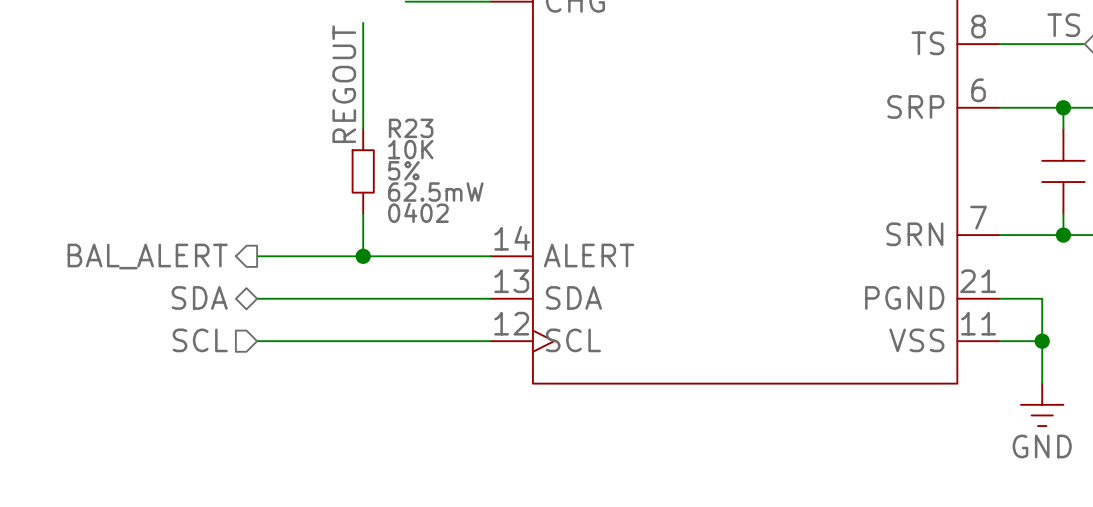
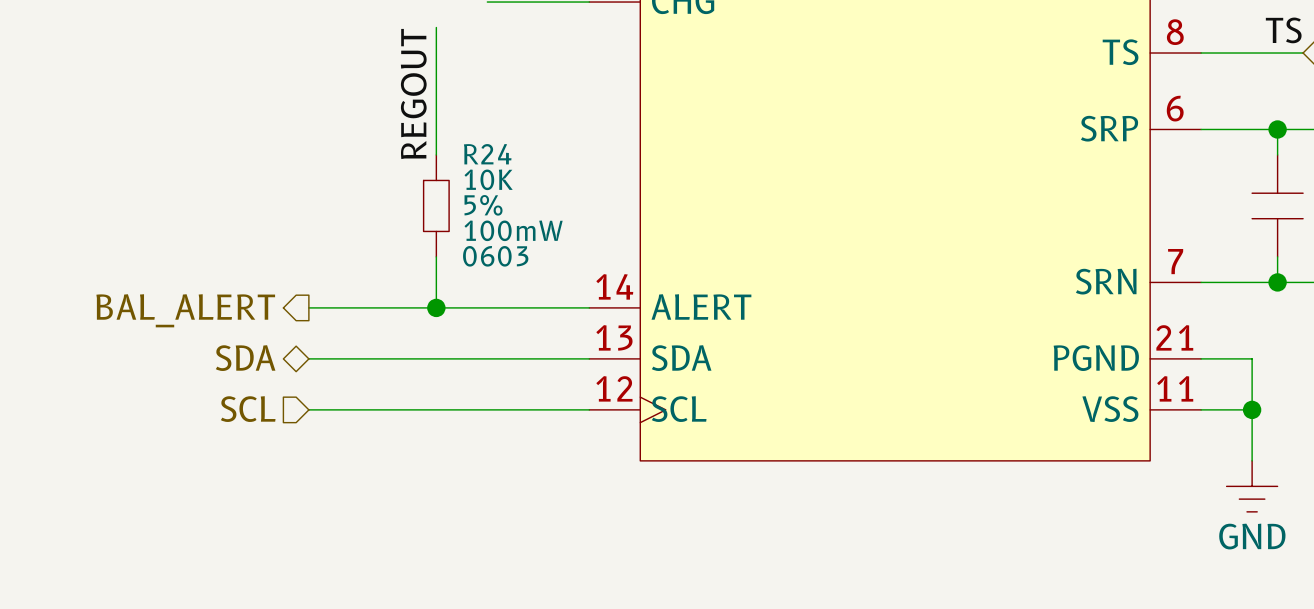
R23 name: R23 (411, 128) -> R24 (487, 154)
R23 text: 62.5mW (435, 192) -> 100mW (513, 230)
R23 text: 0402 (418, 212) -> 0603 (495, 256)

